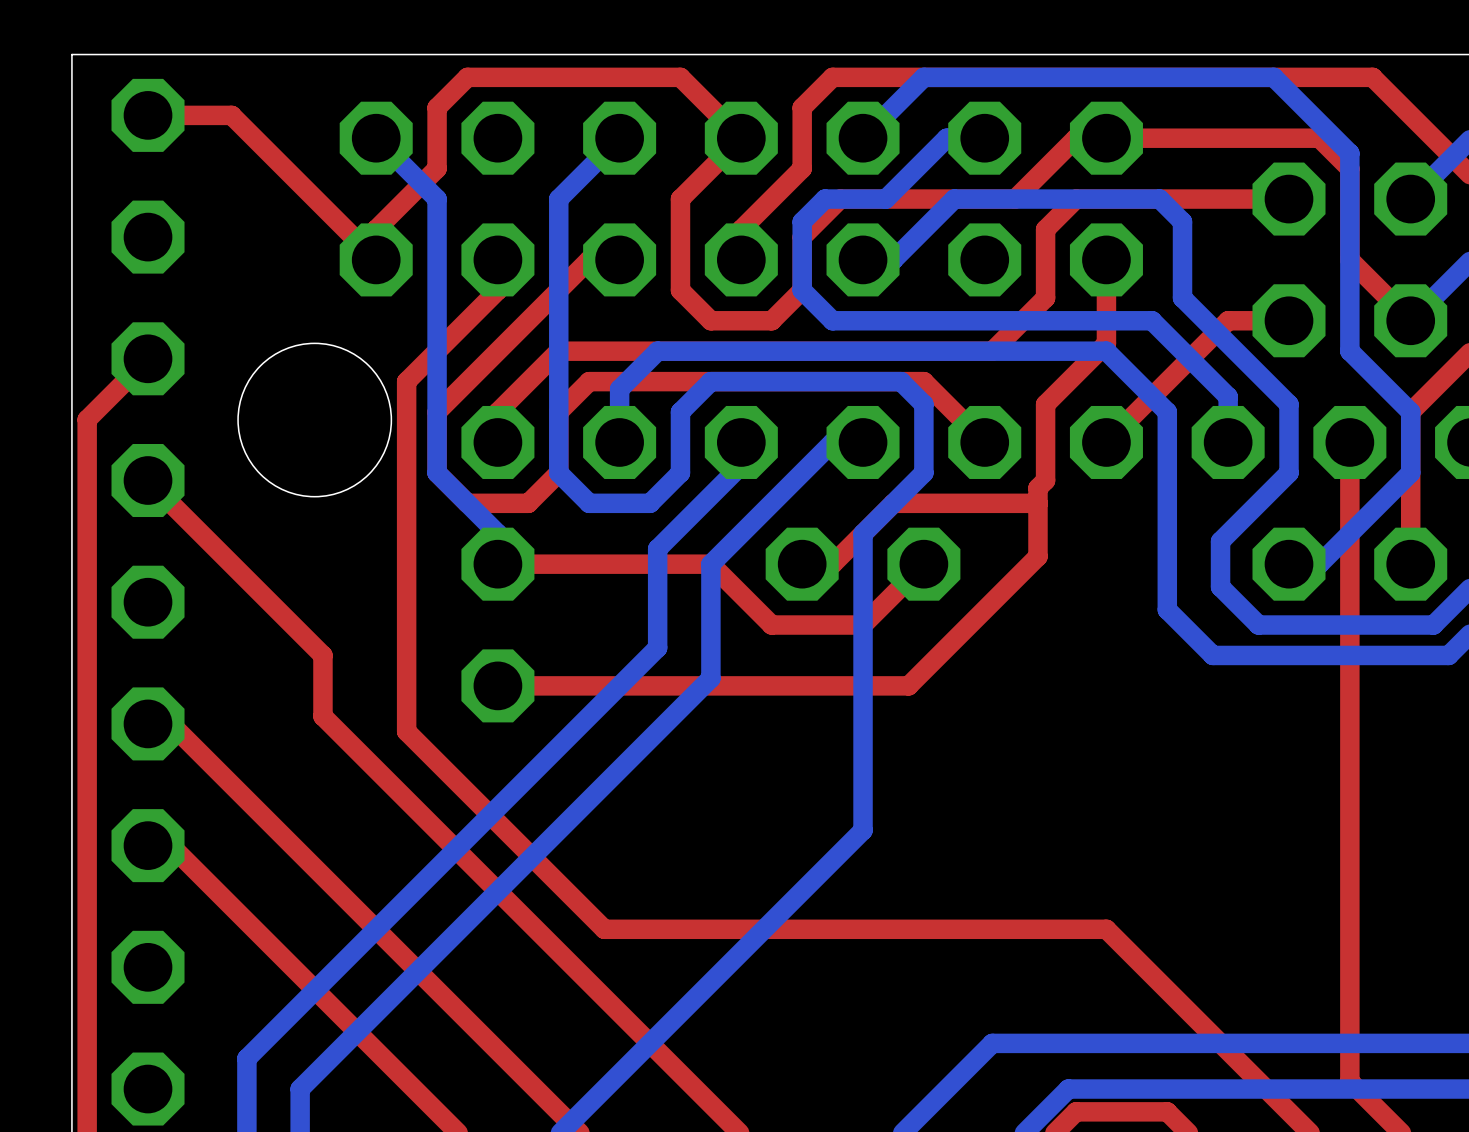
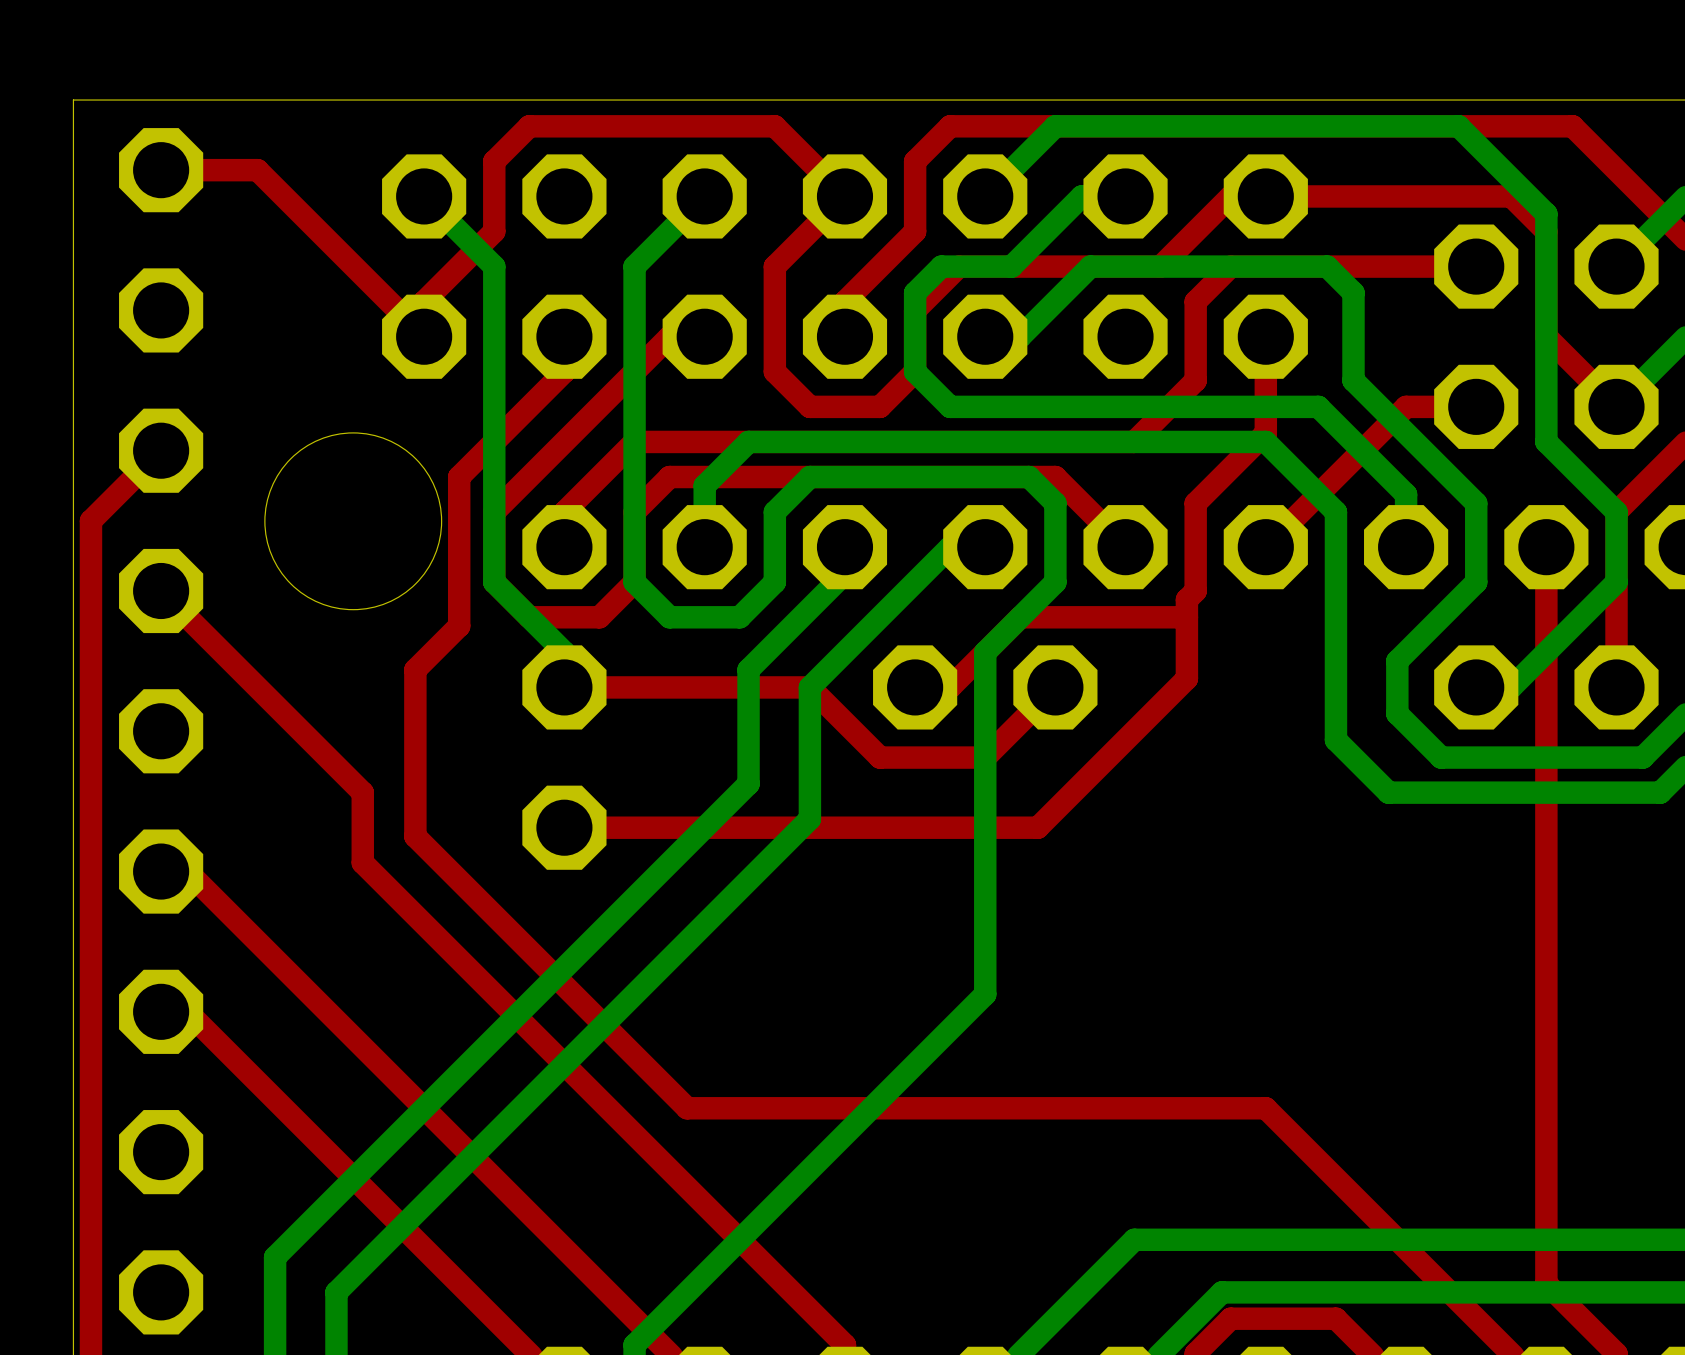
top track: (406, 510) (406, 731) -> (459, 626) (415, 669) (415, 836) (459, 880)

